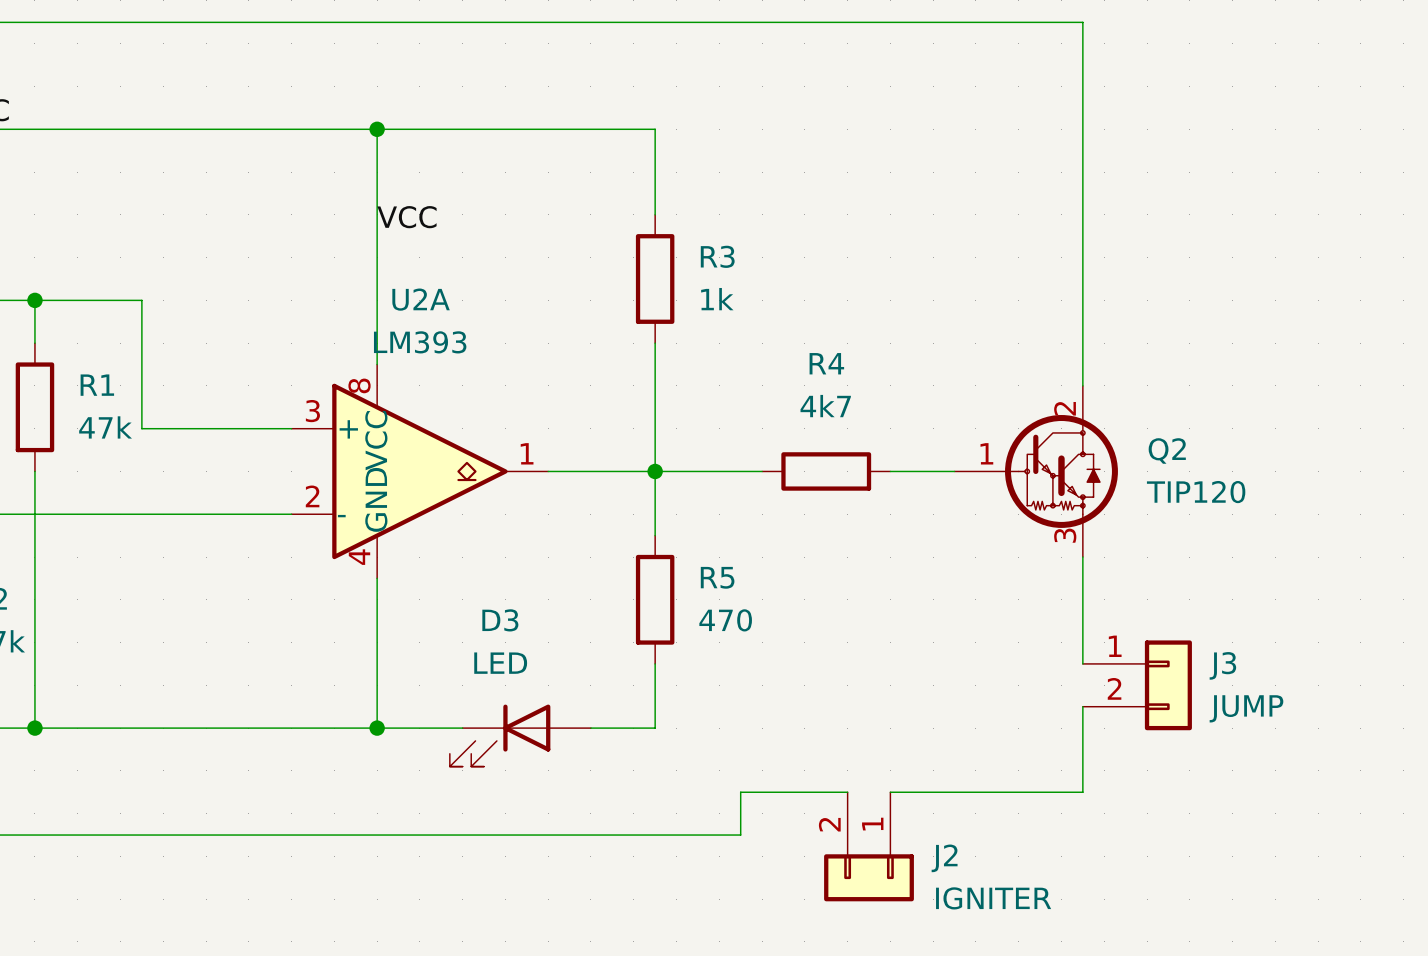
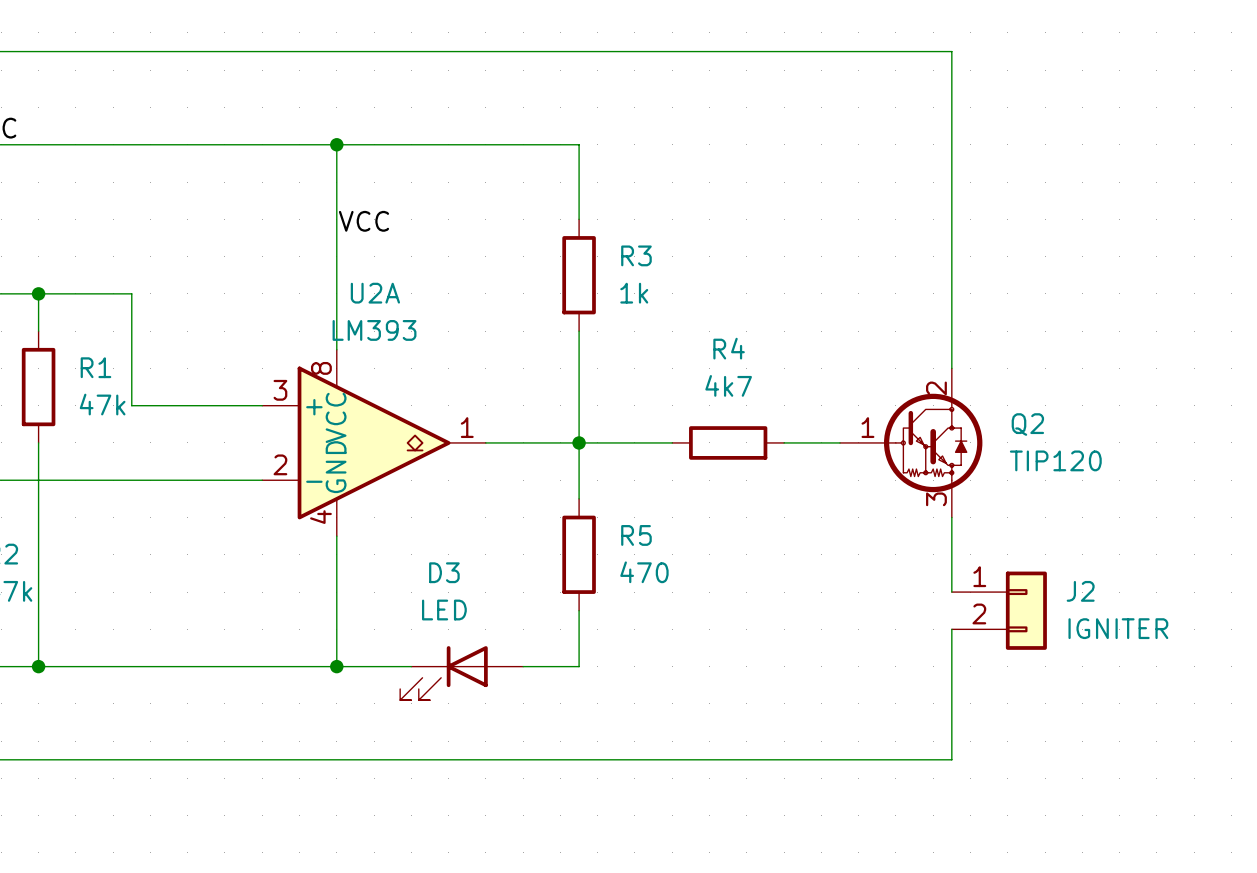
wire: (1082, 642) (1082, 663) -> (951, 629) (951, 647)
J3: JUMP (1137, 685) -> none
wire: (847, 792) (740, 792) (740, 835) -> none
wire: (890, 792) (1082, 792) -> (653, 759) (951, 759) (951, 722)
J2 position: (869, 846) -> (999, 610)
J2 rotation: 0° (869, 877) -> 90° counterclockwise (1026, 610)

